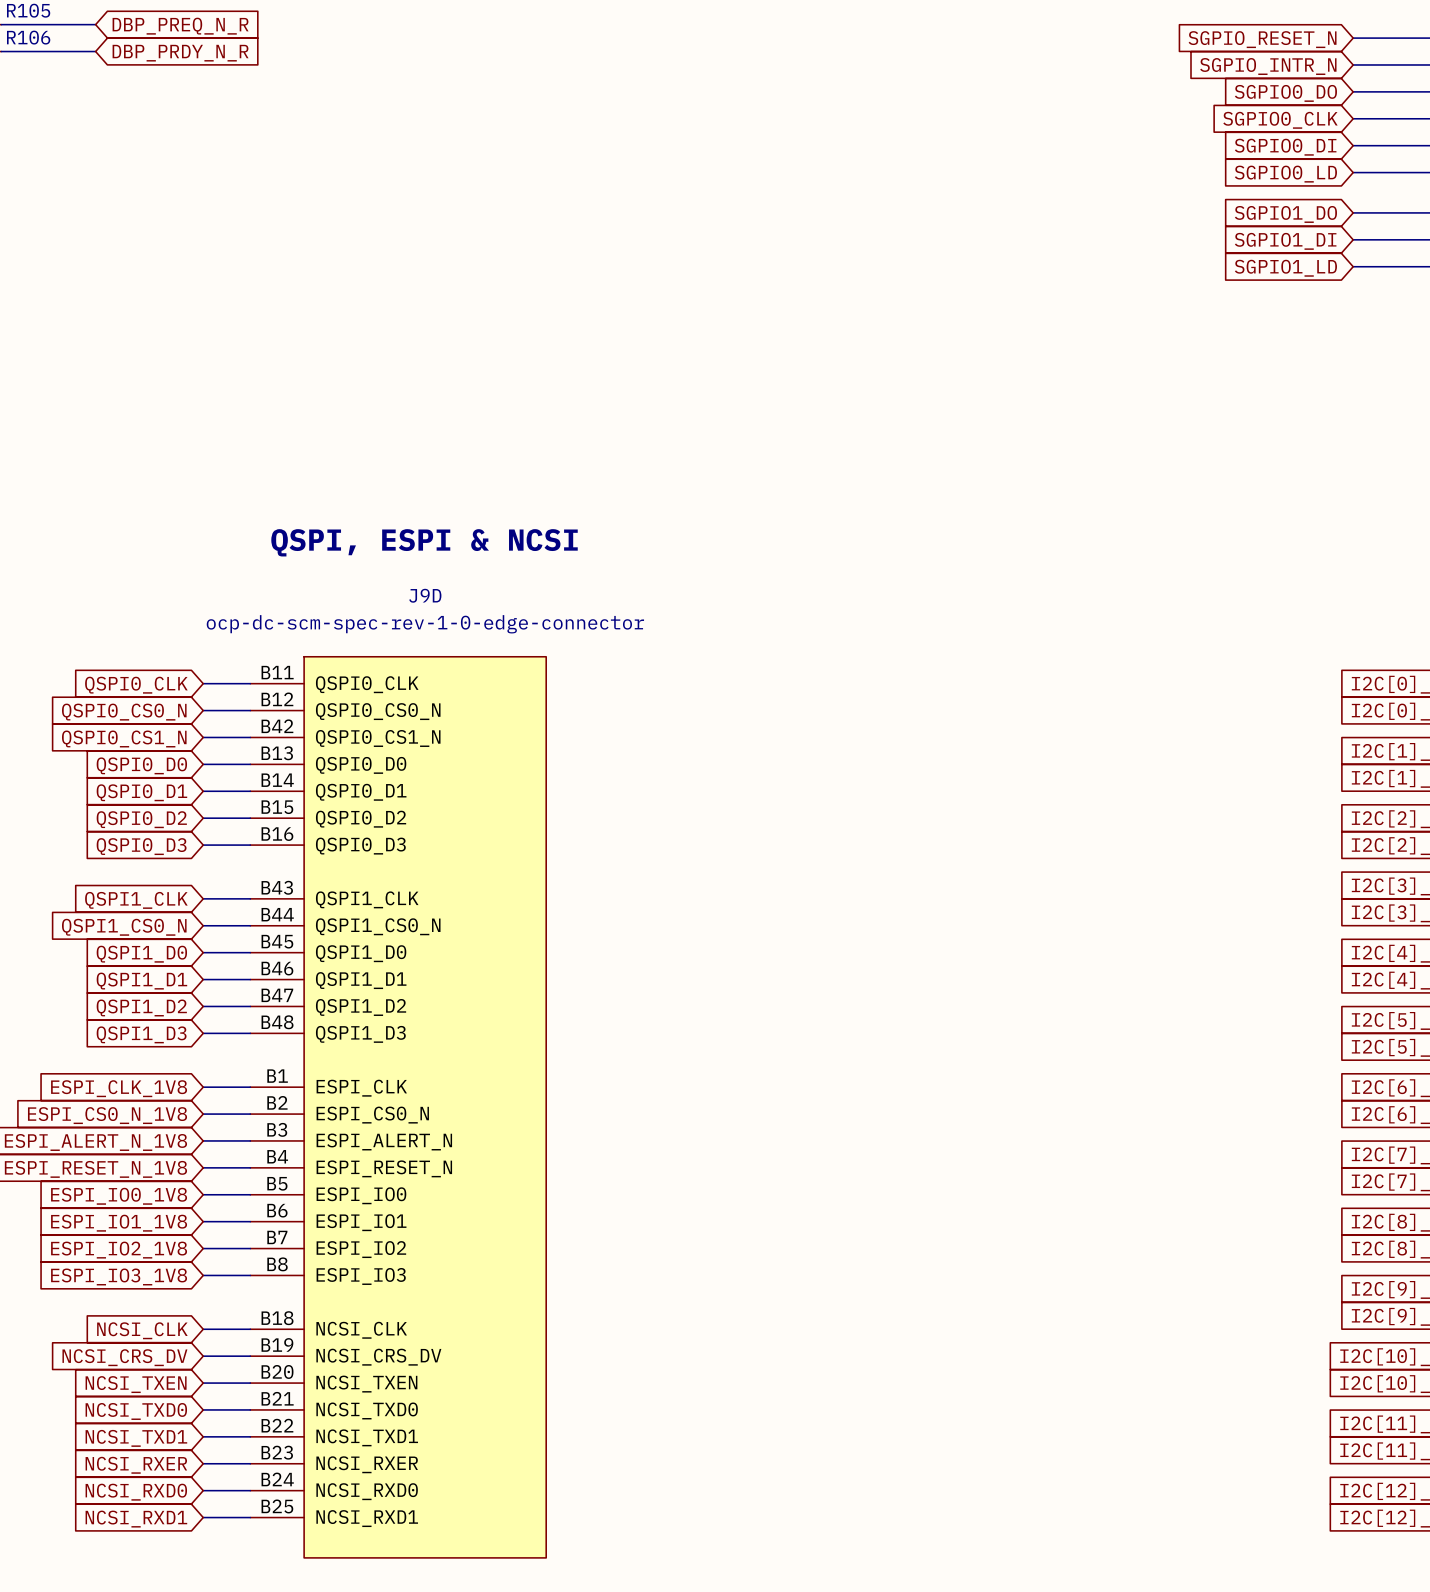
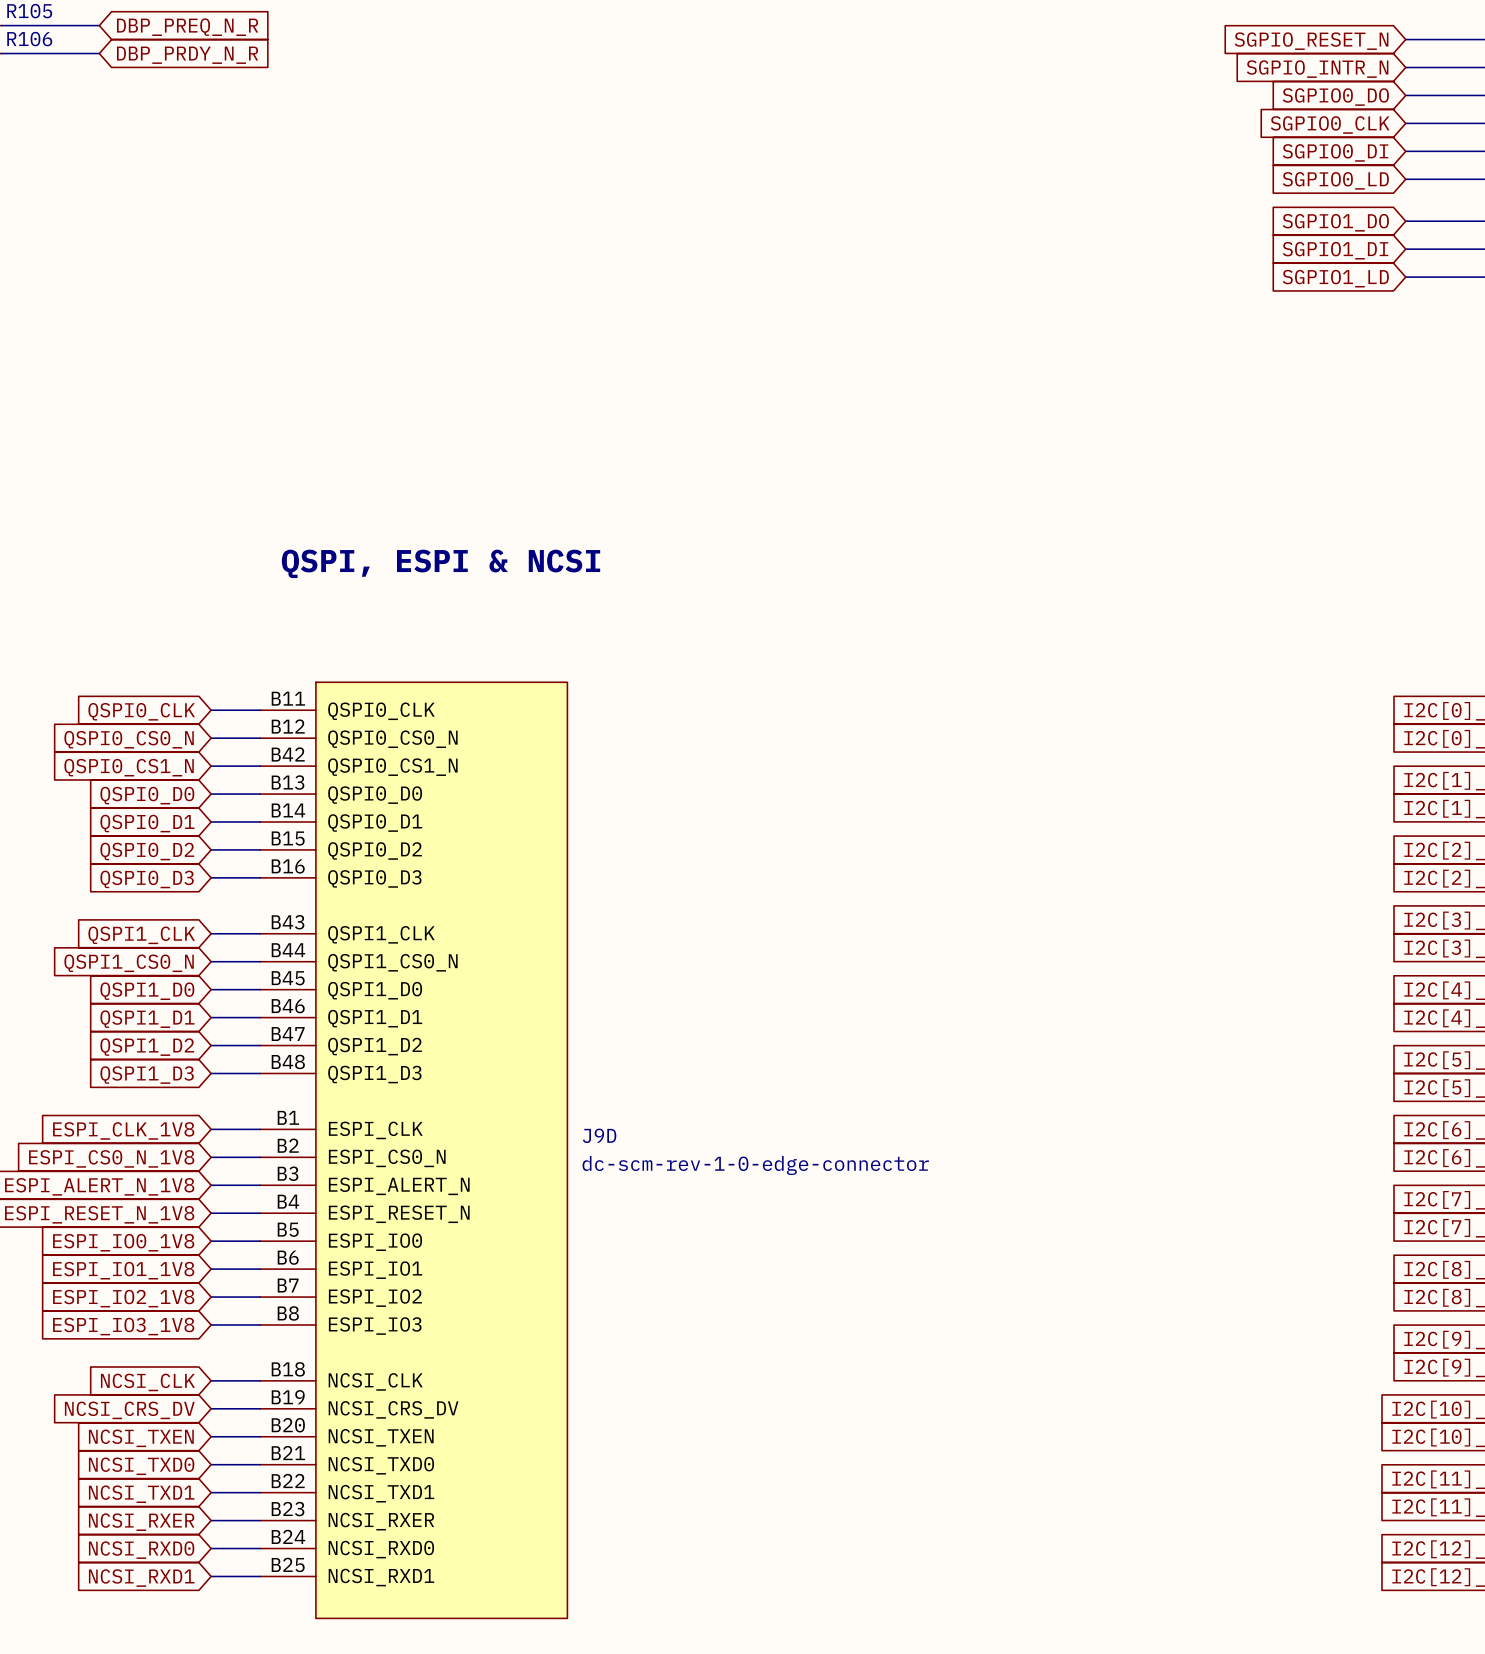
J9D name position: J9D (425, 595) -> J9D (599, 1135)
J9D value: ocp-dc-scm-spec-rev-1-0-edge-connector (425, 624) -> dc-scm-rev-1-0-edge-connector (755, 1165)

